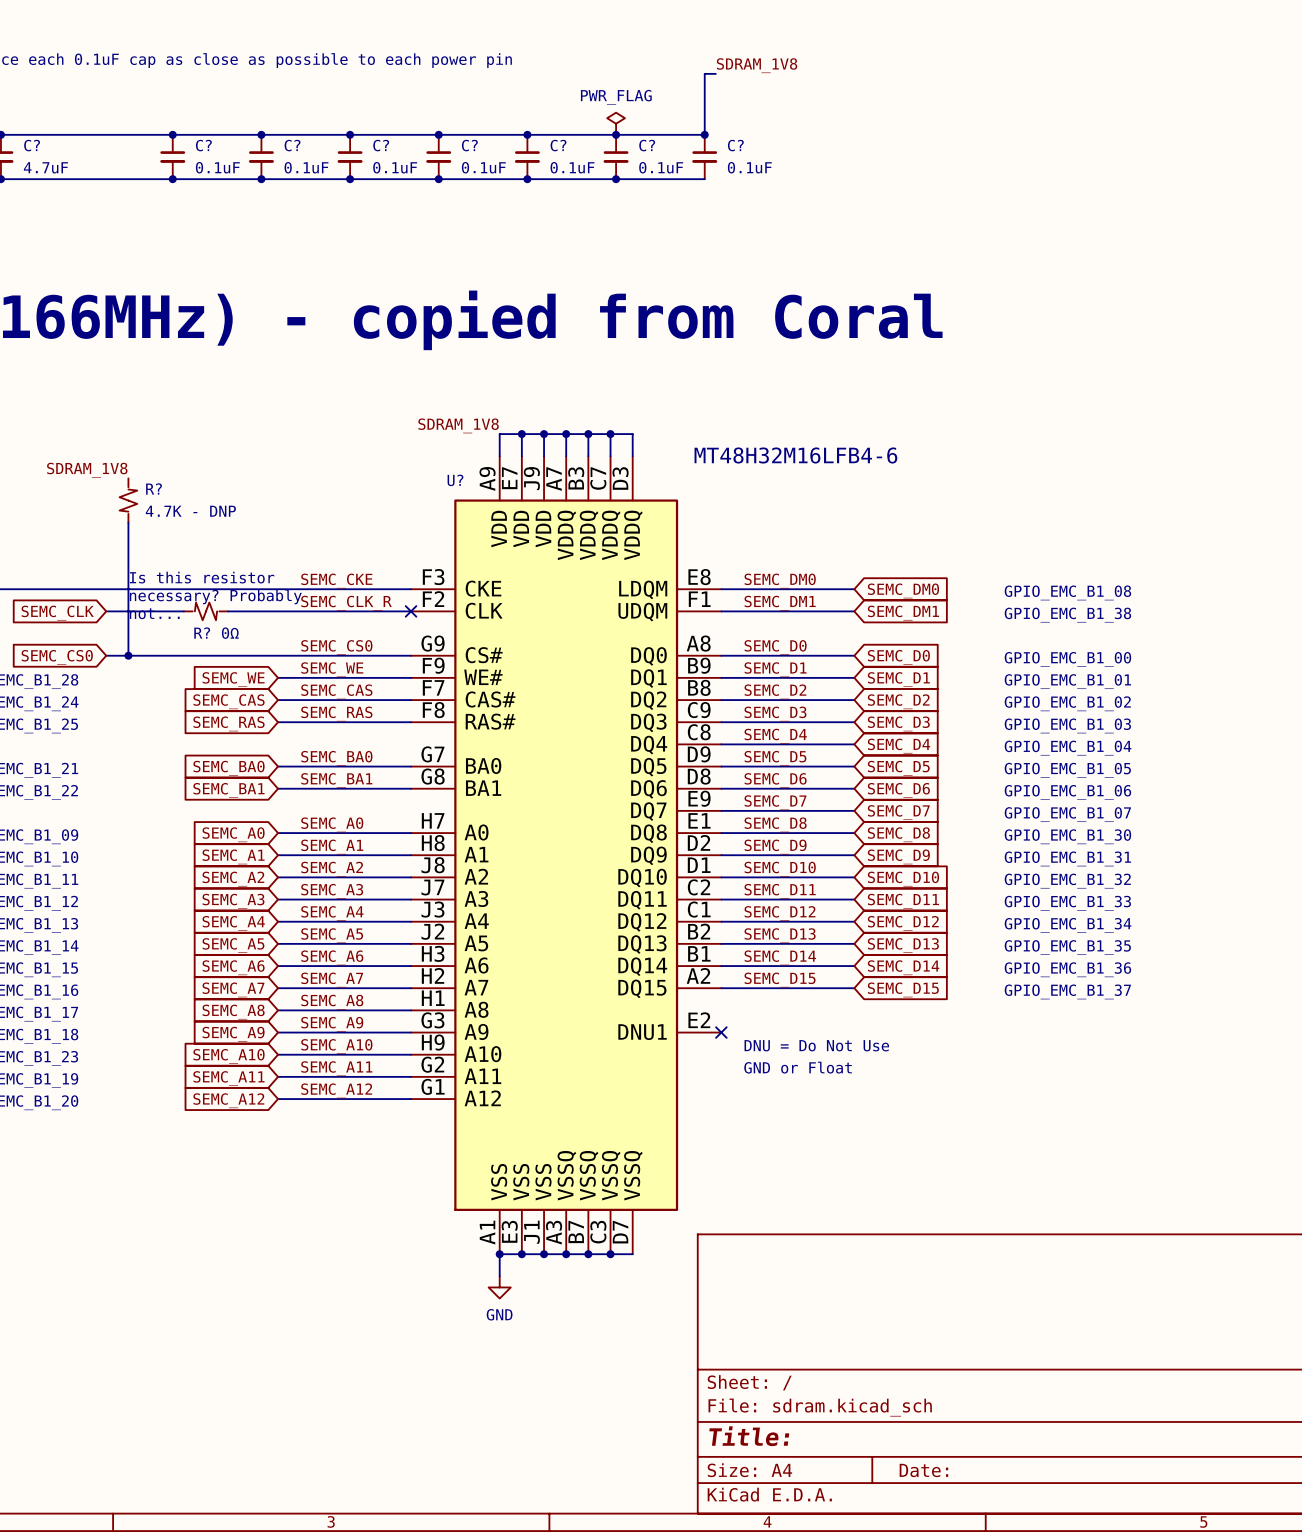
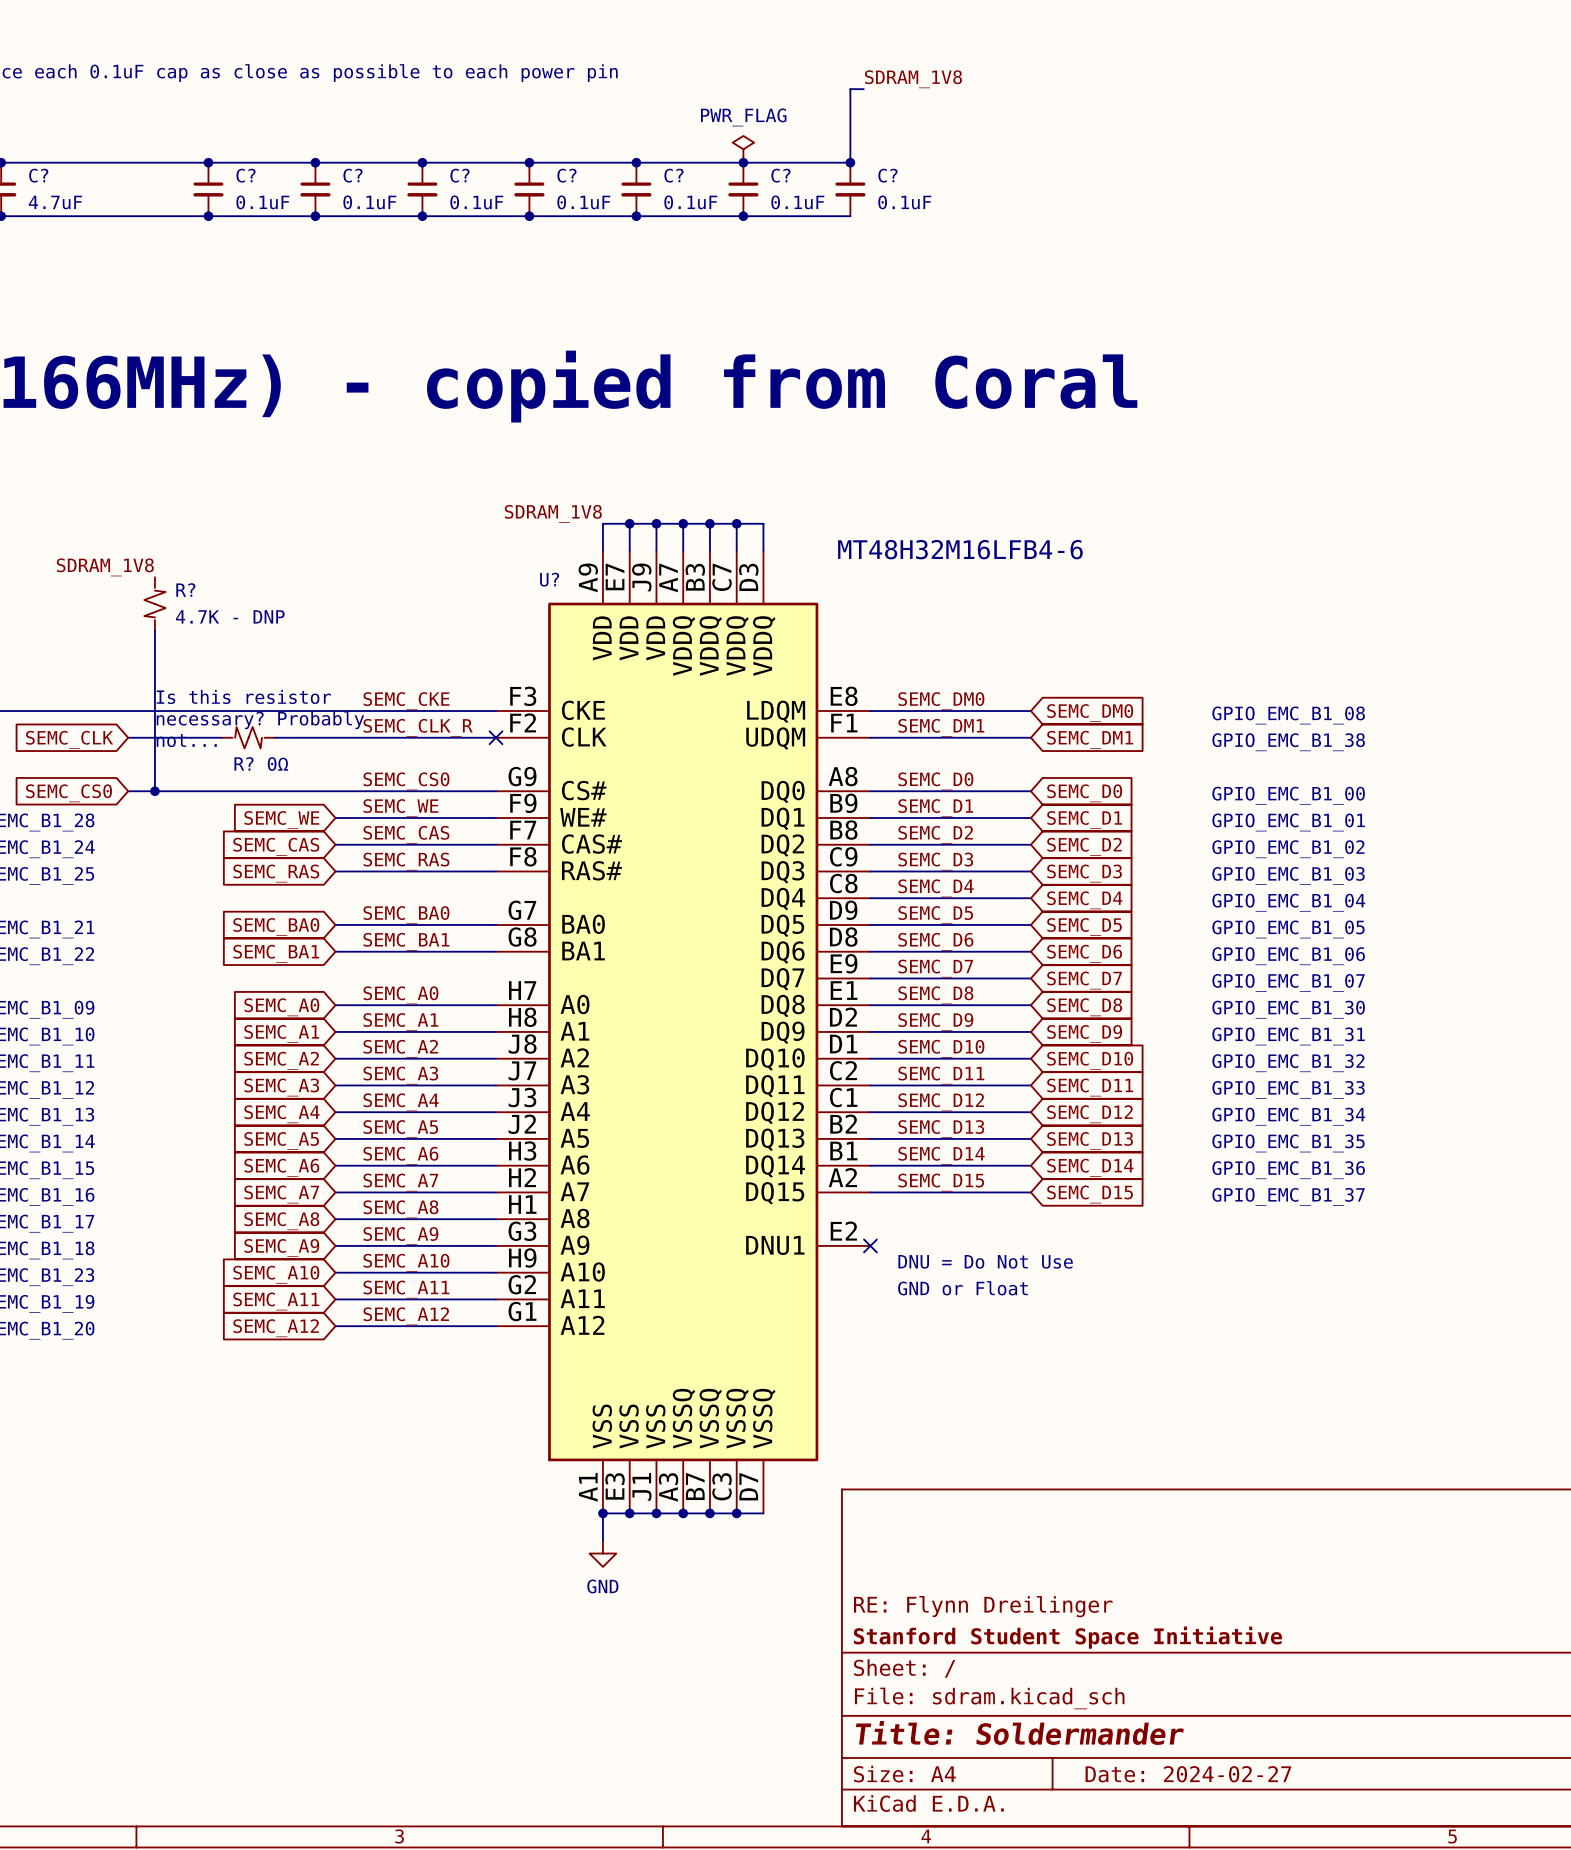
title block: none -> RE: Flynn Dreilinger (983, 1606)
title block: none -> Stanford Student Space Initiative (1067, 1637)
title block: Title: (749, 1436) -> Title: Soldermander (1019, 1733)
title block: Date: (923, 1470) -> Date: 2024-02-27 (1188, 1774)

